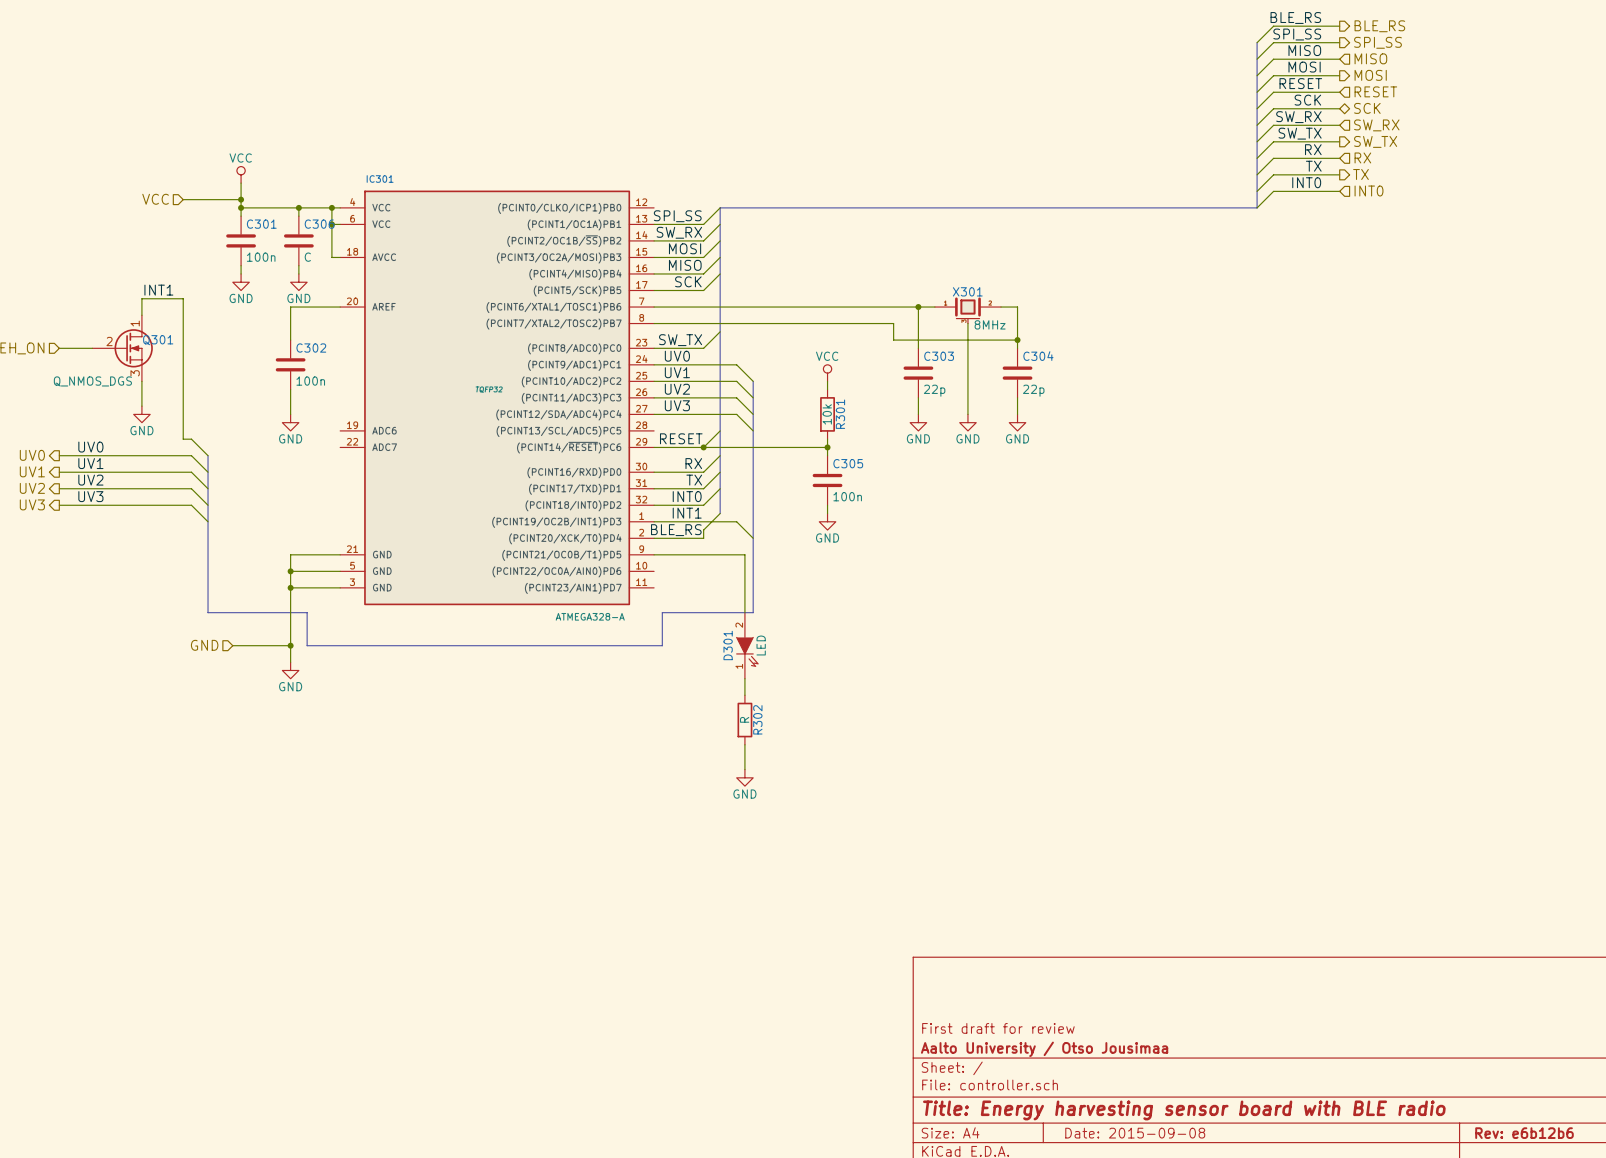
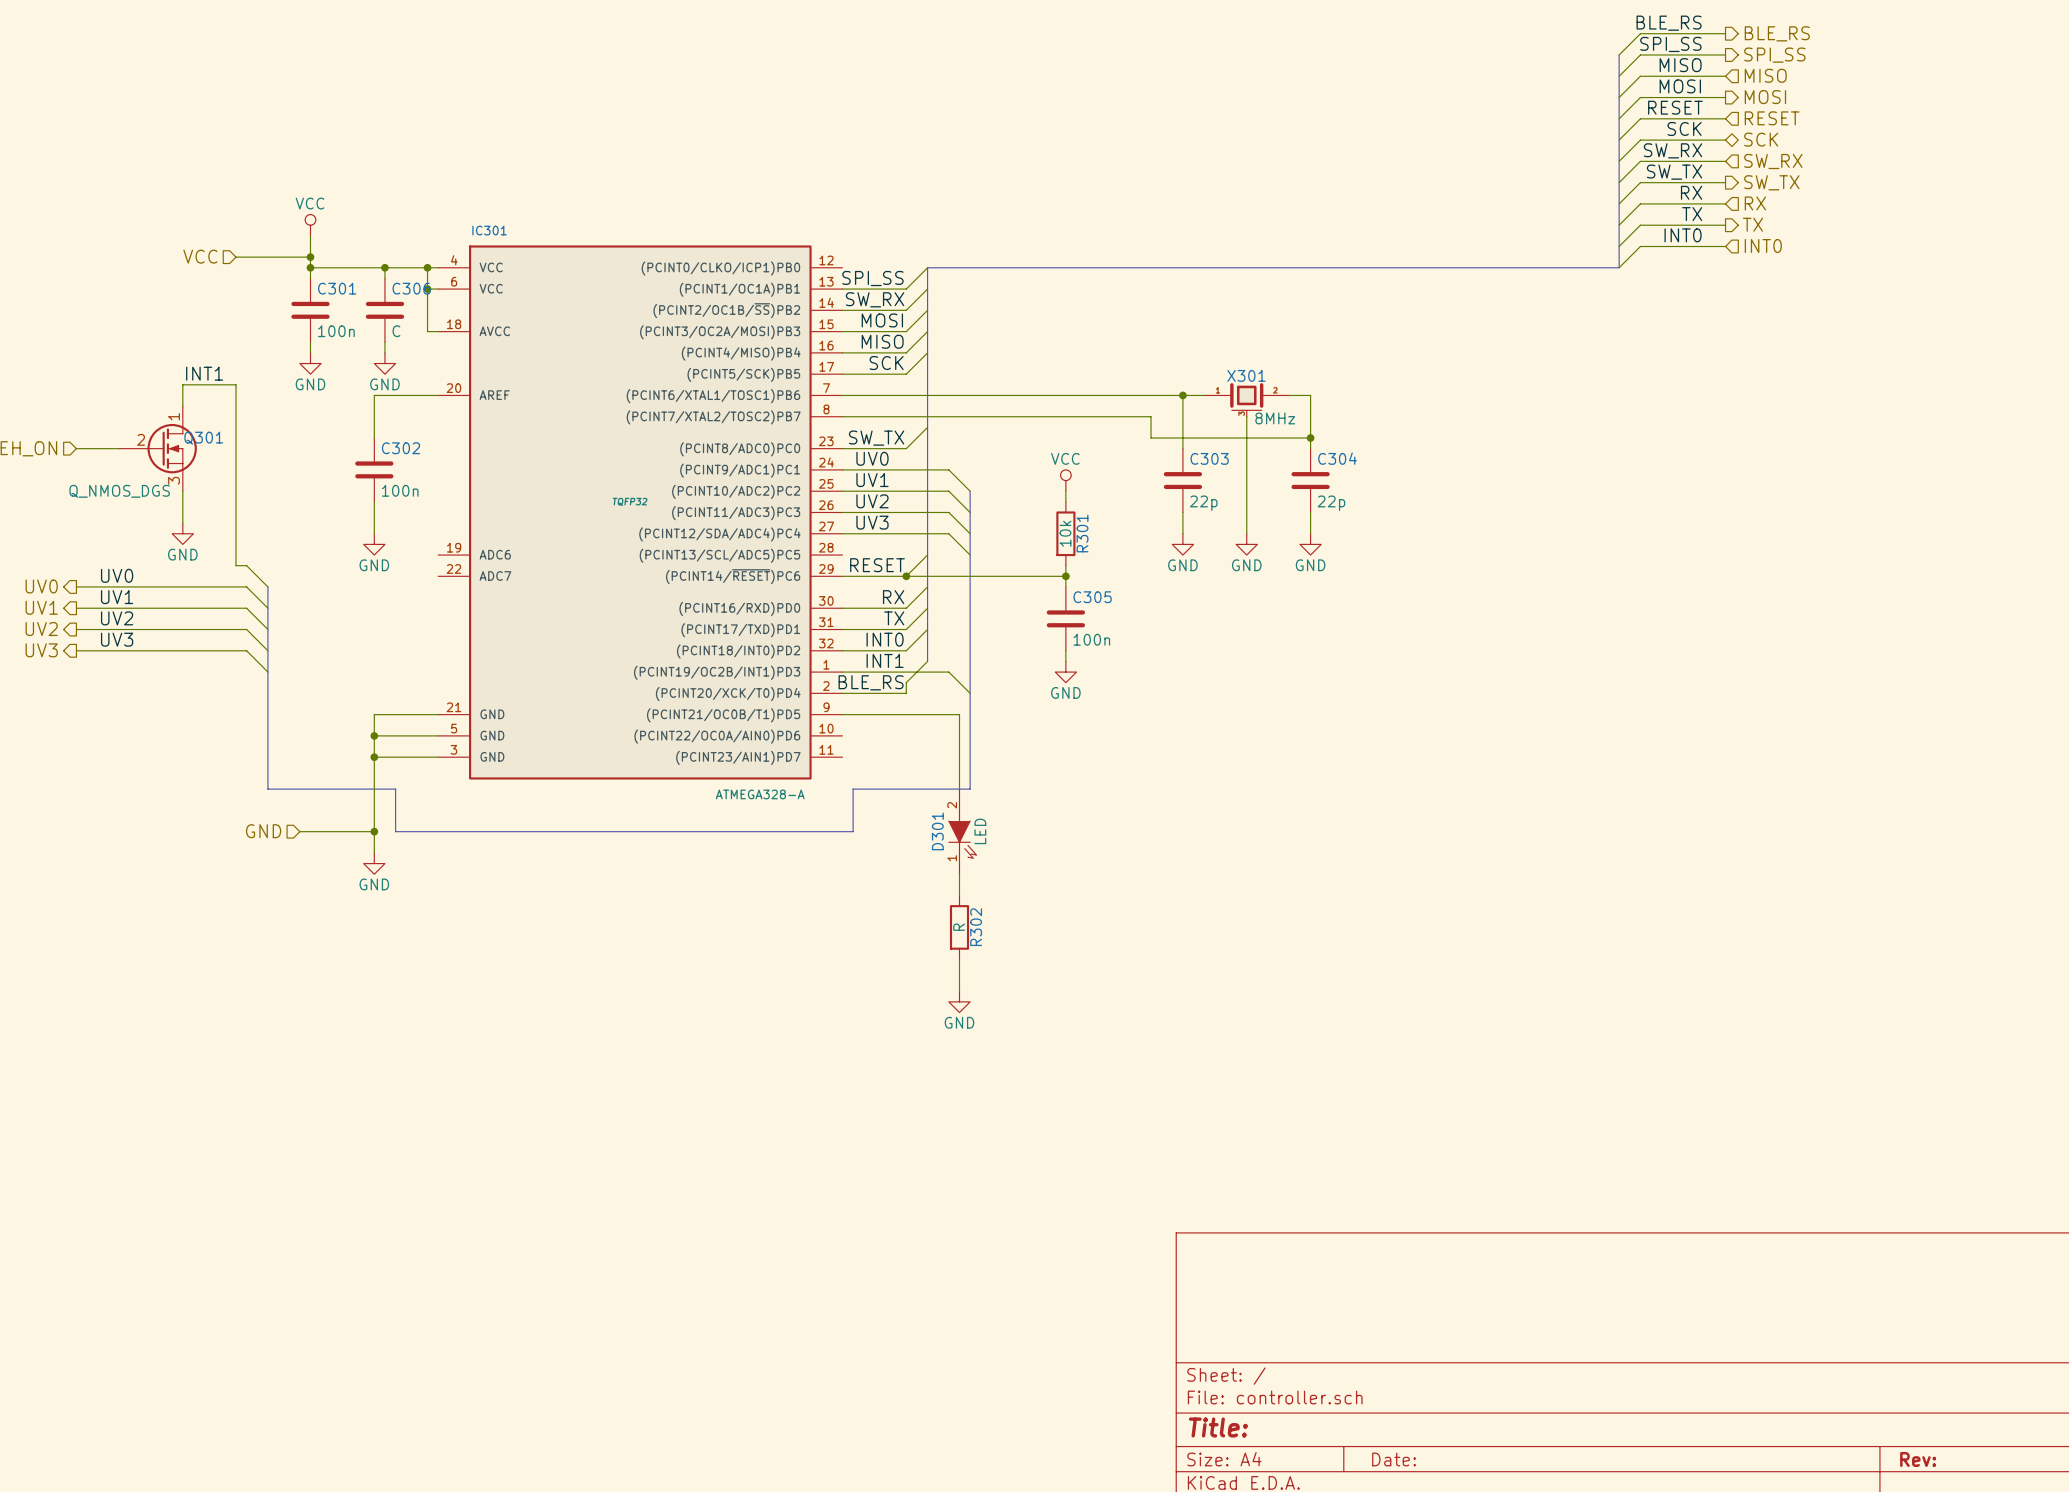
title block: First draft for review (998, 1028) -> none
title block: Aalto University / Otso Jousimaa (1044, 1049) -> none
title block: Title: Energy harvesting sensor board with BLE radio (1184, 1110) -> Title: (1218, 1427)
title block: Date: 2015-09-08 (1135, 1133) -> Date: (1393, 1459)
title block: Rev: e6b12b6 (1524, 1133) -> Rev: (1918, 1459)

